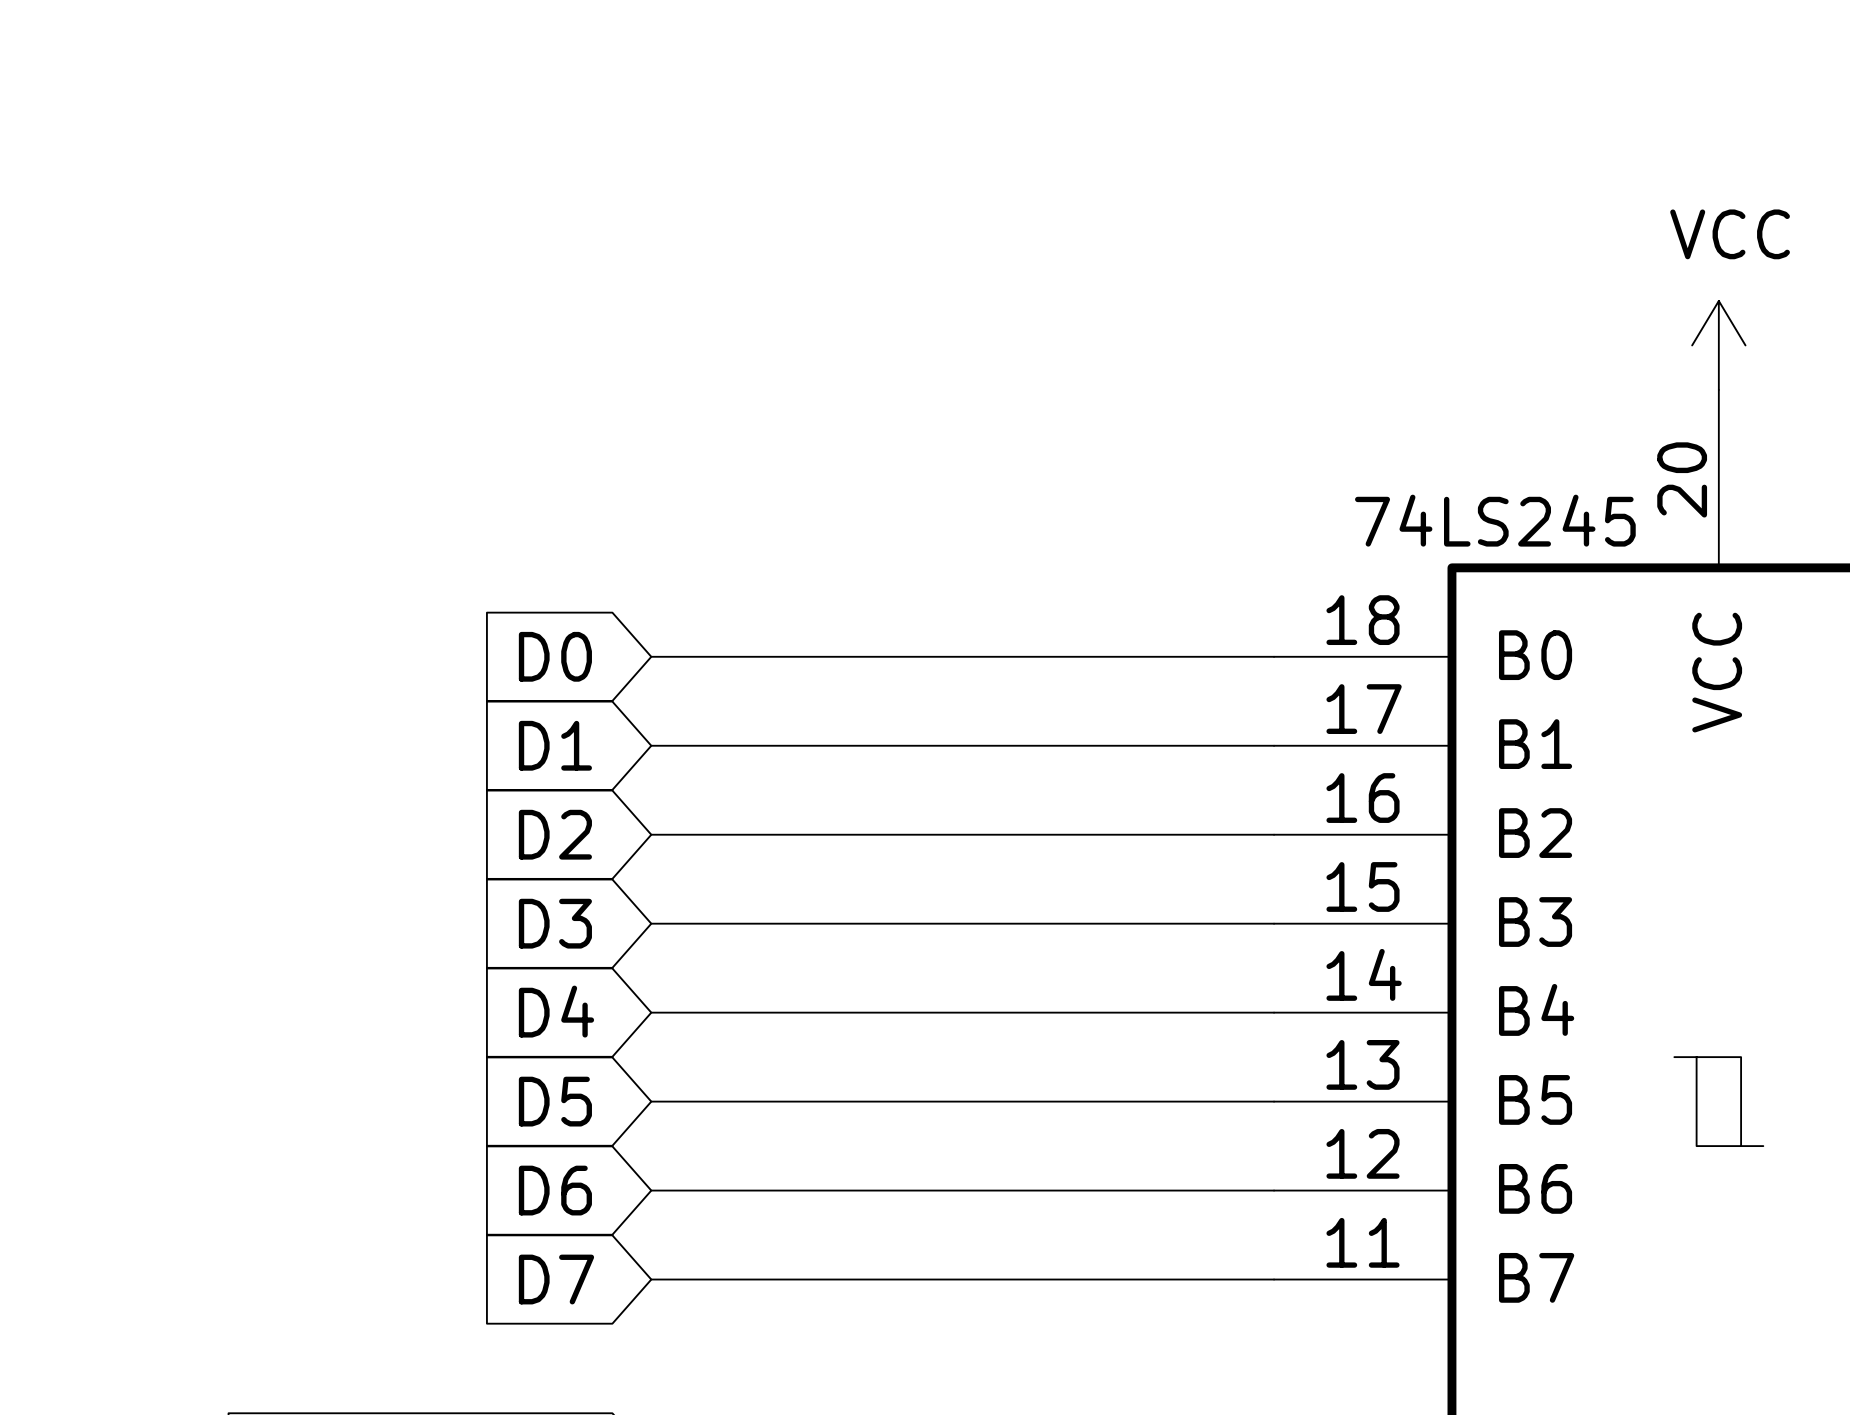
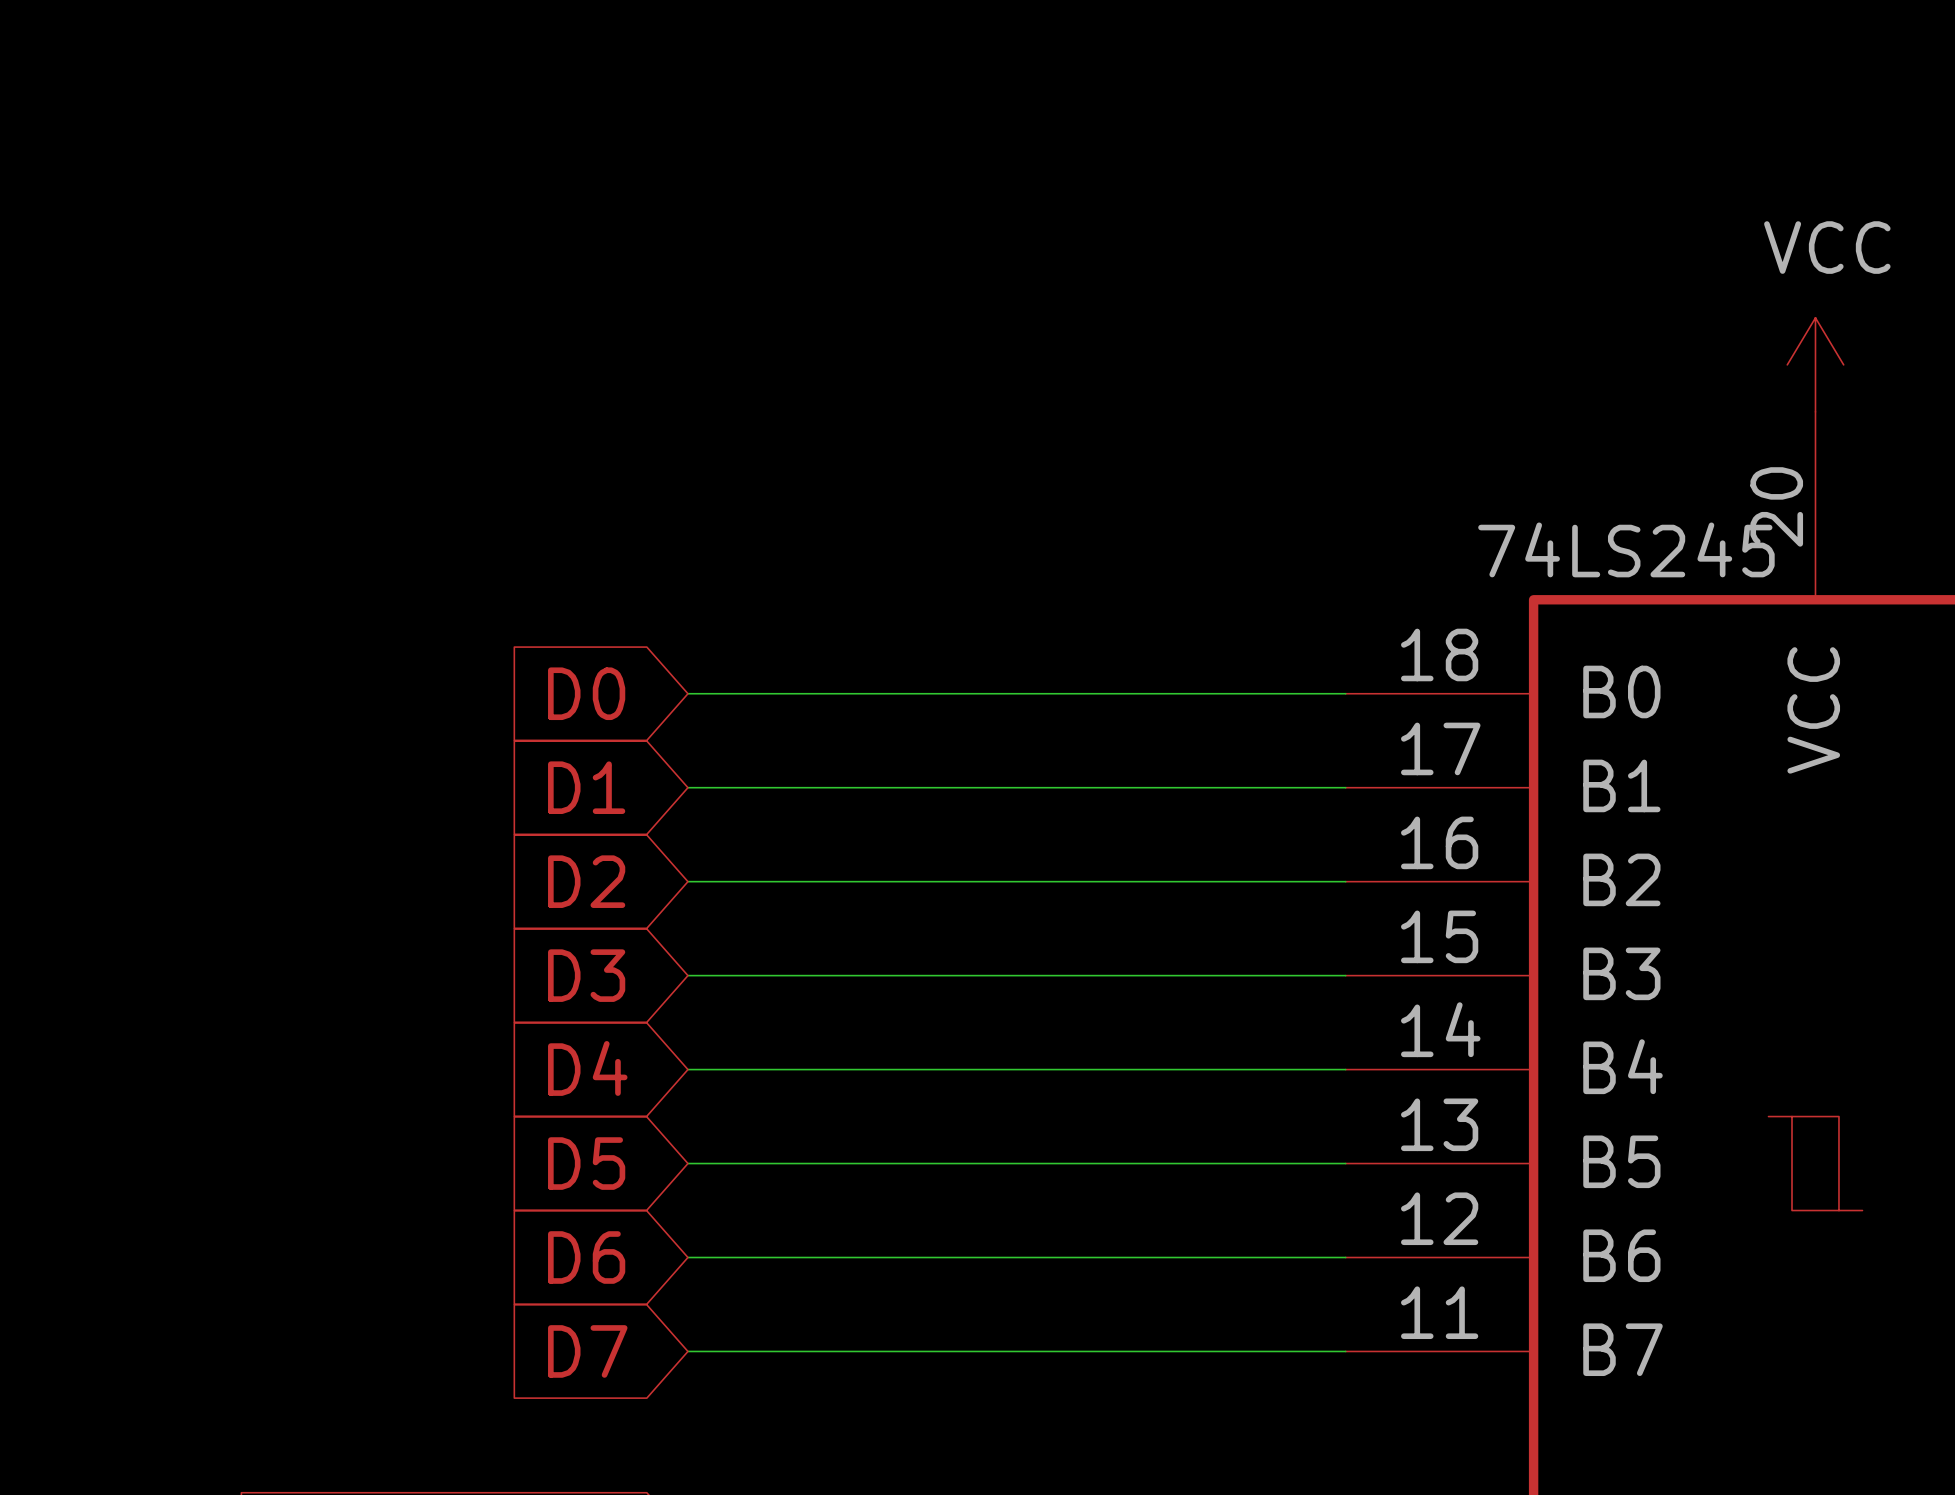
part value position: 74LS245 (1495, 520) -> 74LS245 (1626, 549)

